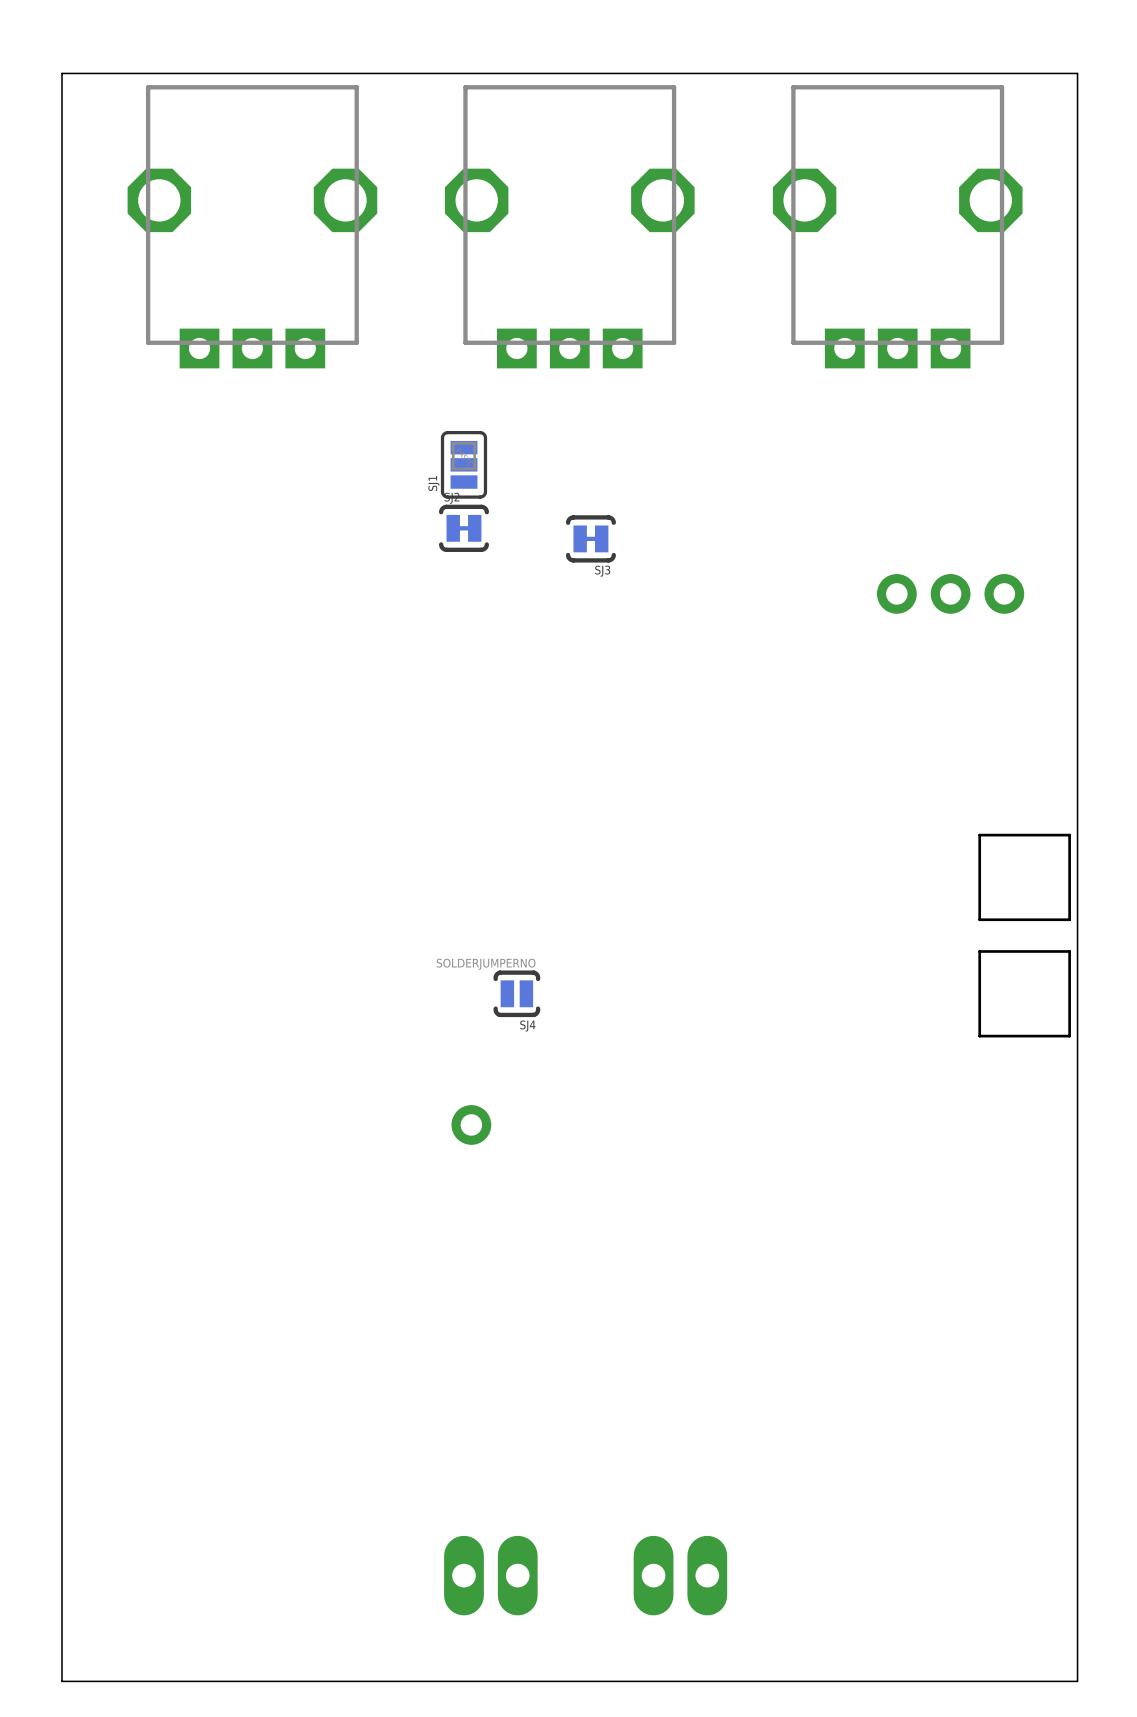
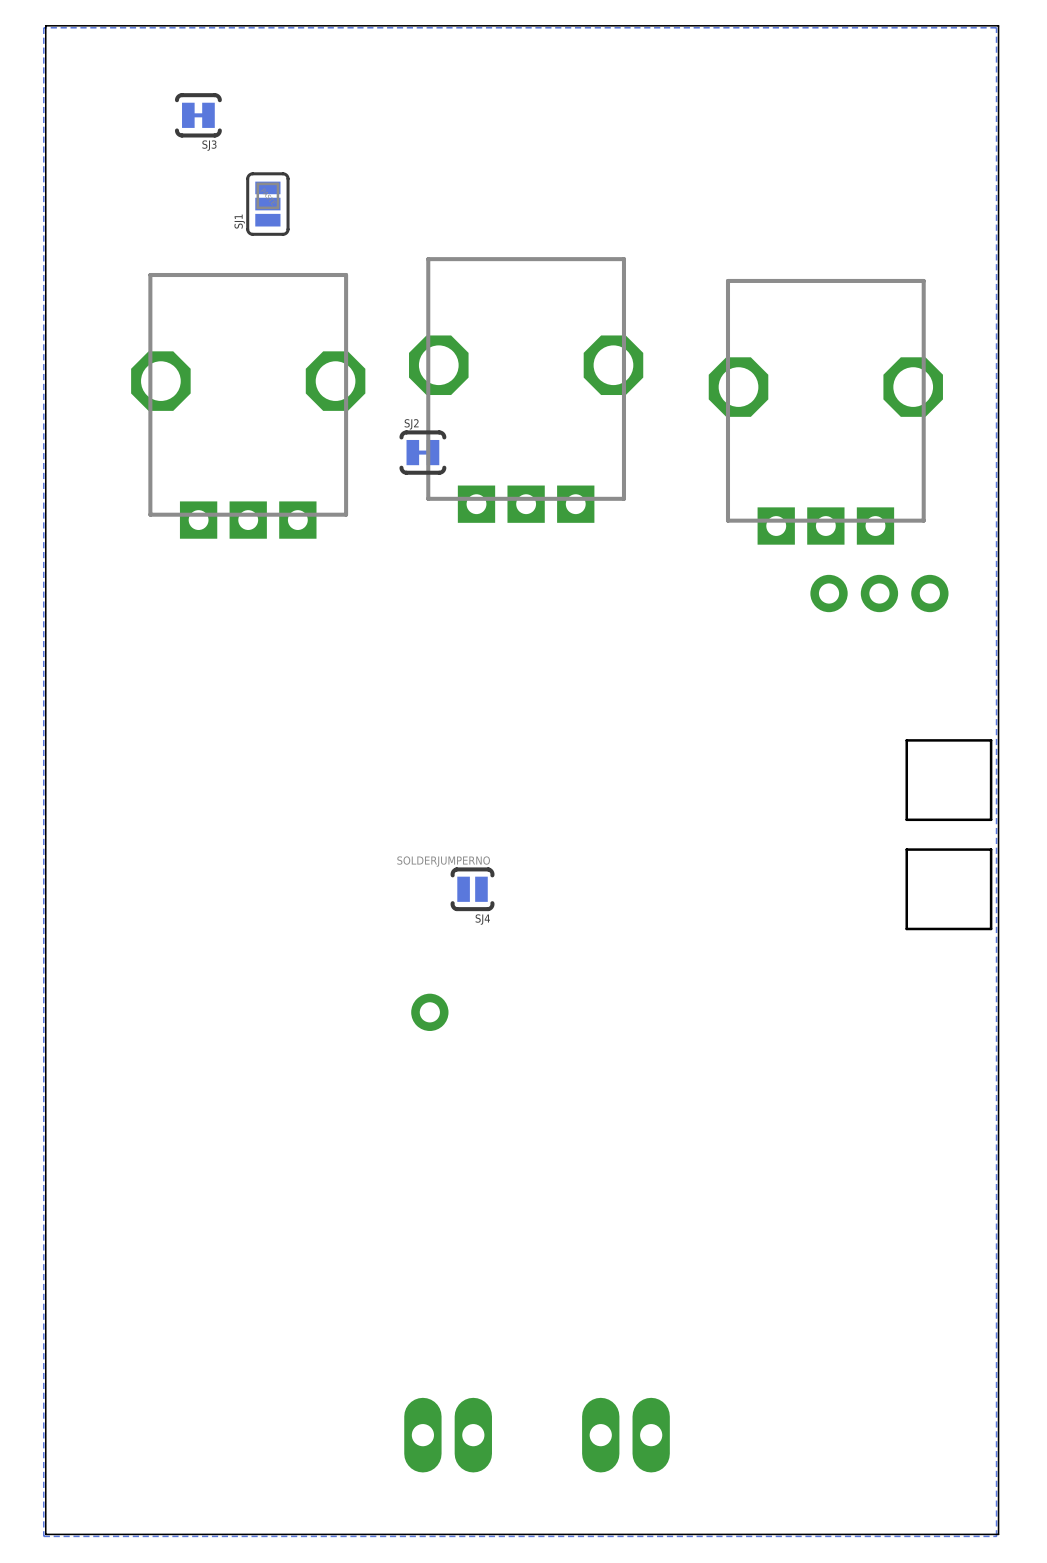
zone outline: none -> (996, 27) (43, 27) (43, 1536) (996, 1536) (996, 27)
part: (252, 226) -> none
part: (569, 226) -> none
part: (897, 226) -> none
part: none -> (526, 389)
SJ1 position: (463, 464) -> (267, 204)
part: none -> (248, 405)
part: none -> (825, 411)
SJ3 position: (590, 538) -> (198, 115)
part position: (950, 593) -> (879, 593)

